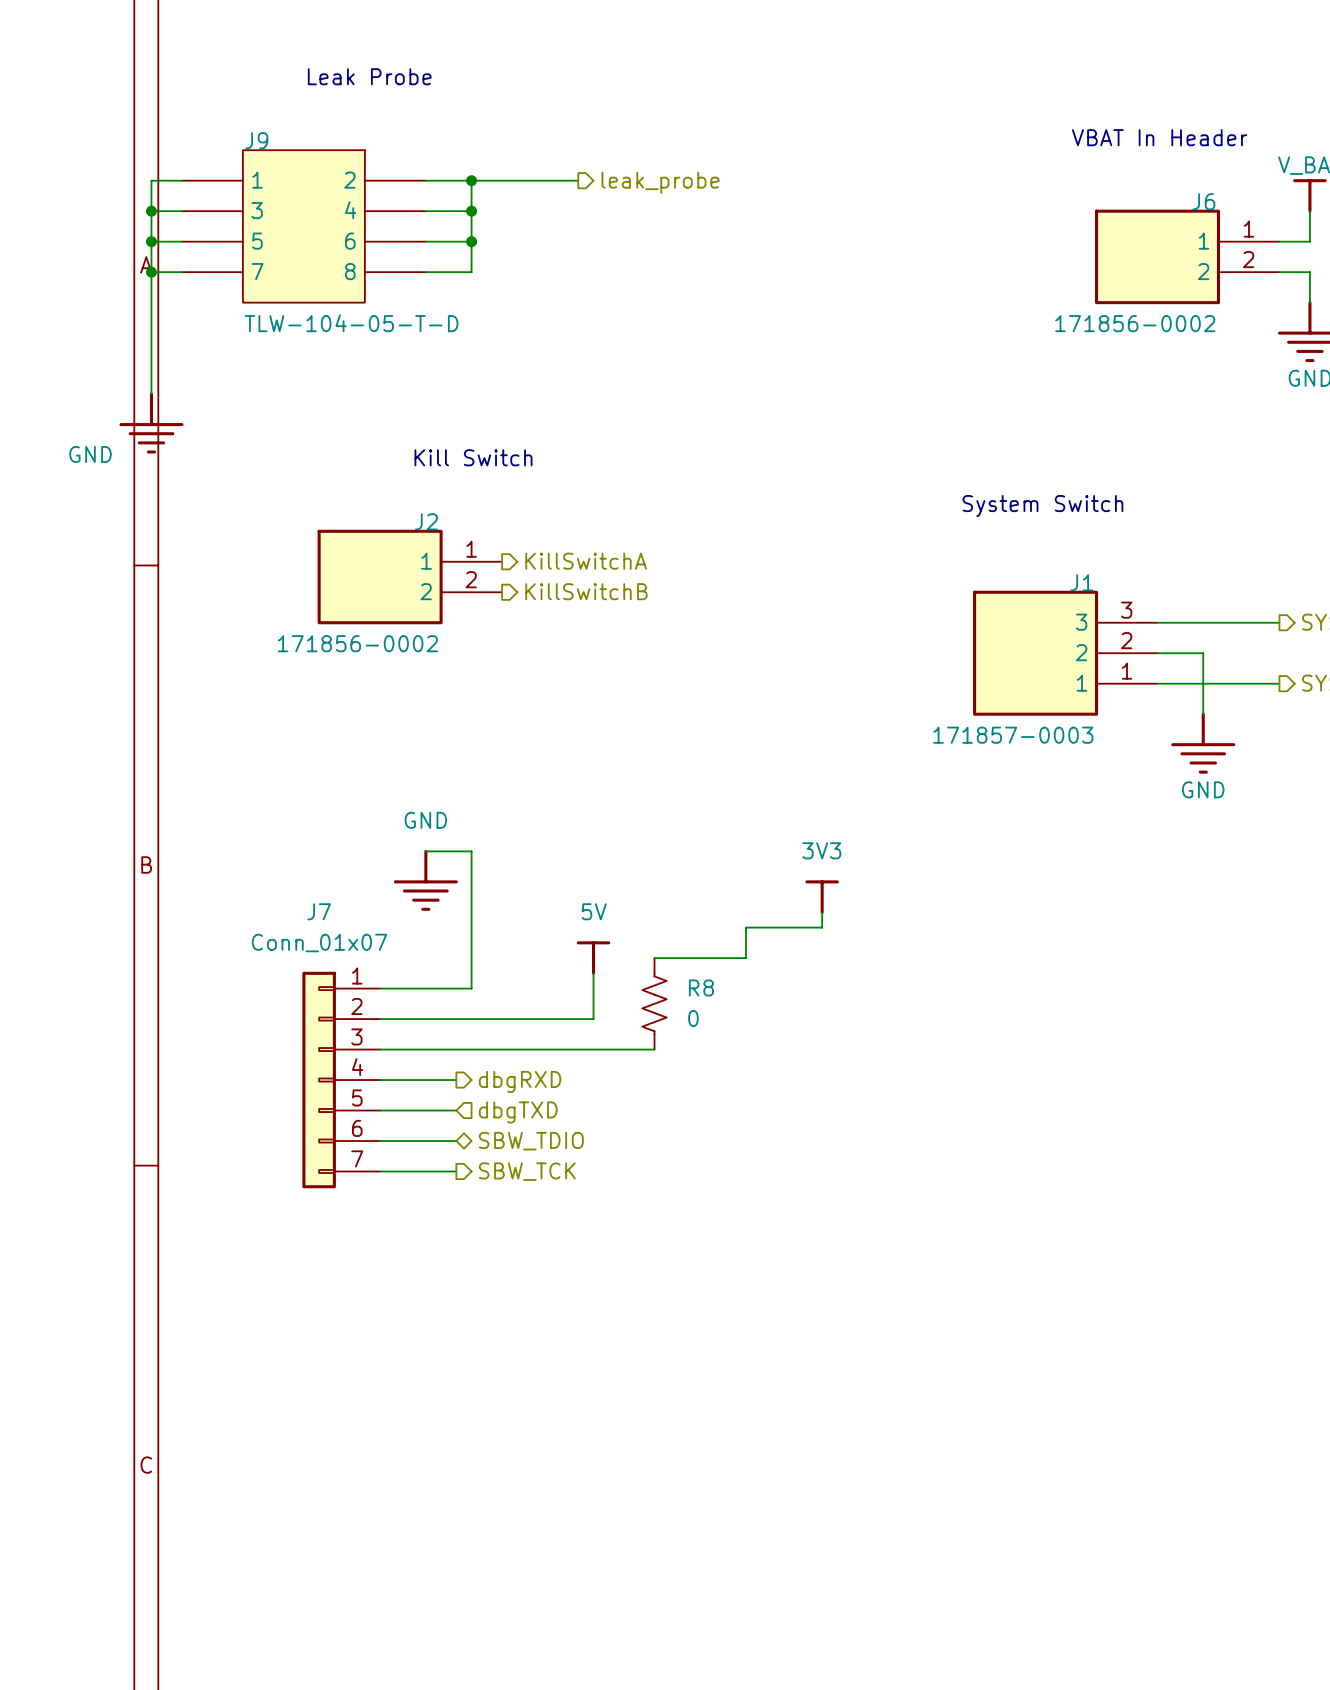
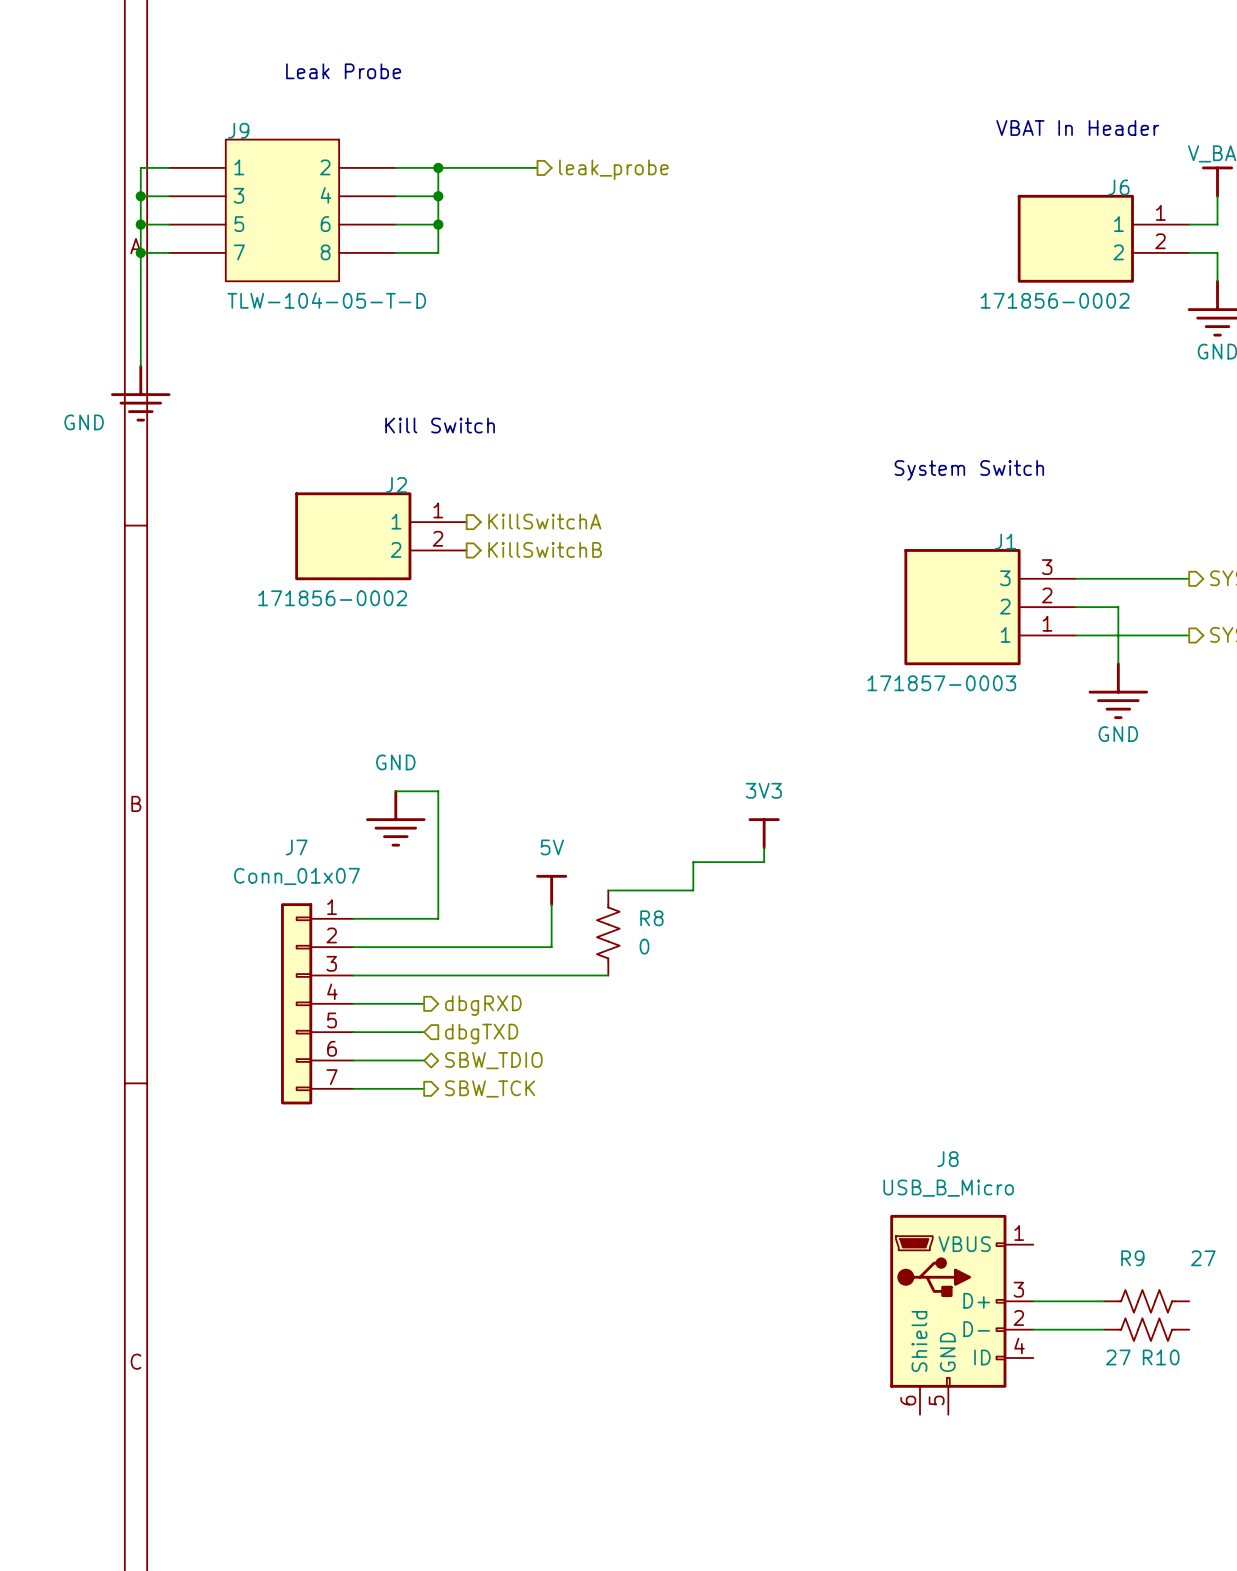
wire: none -> (1033, 1301) (1104, 1301)
R9: none -> 27 (1146, 1301)
J8: none -> USB_B_Micro (961, 1314)
wire: none -> (1033, 1329) (1104, 1329)
R10: none -> 27 (1146, 1329)

